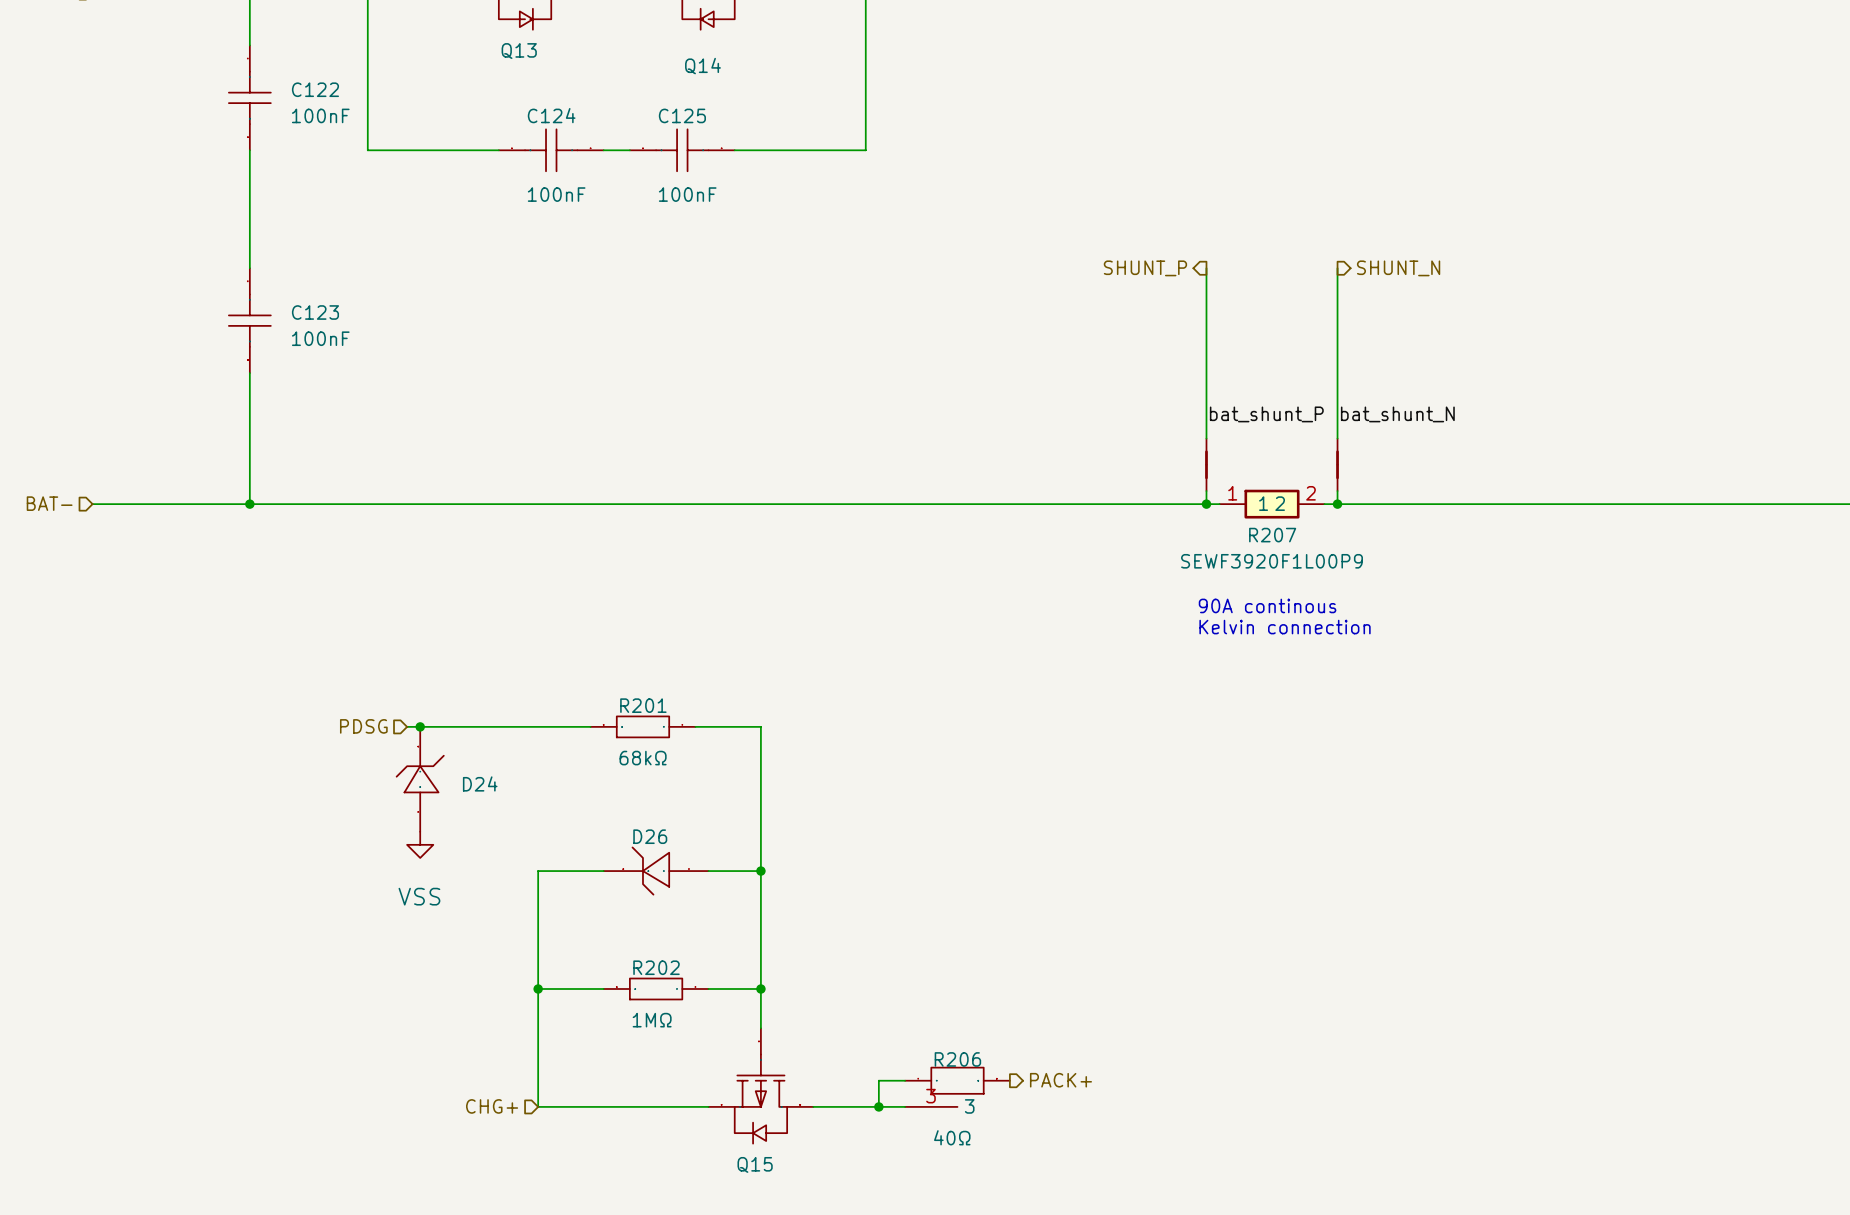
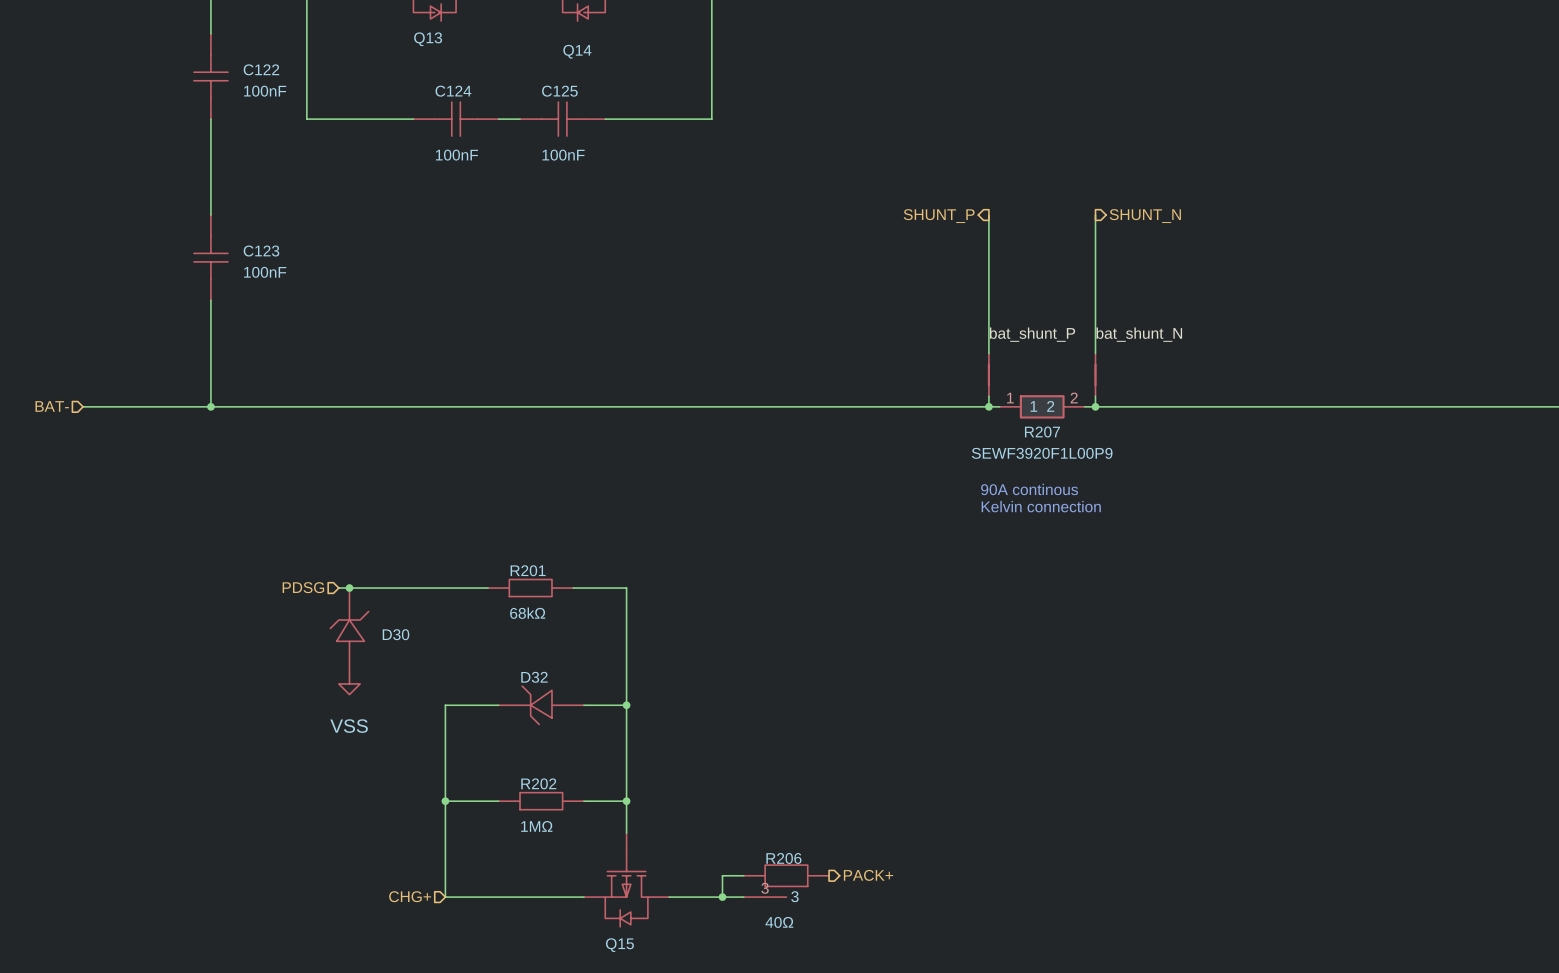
D24 name: D24 (480, 783) -> D30 (396, 634)
D26 name: D26 (650, 836) -> D32 (534, 677)

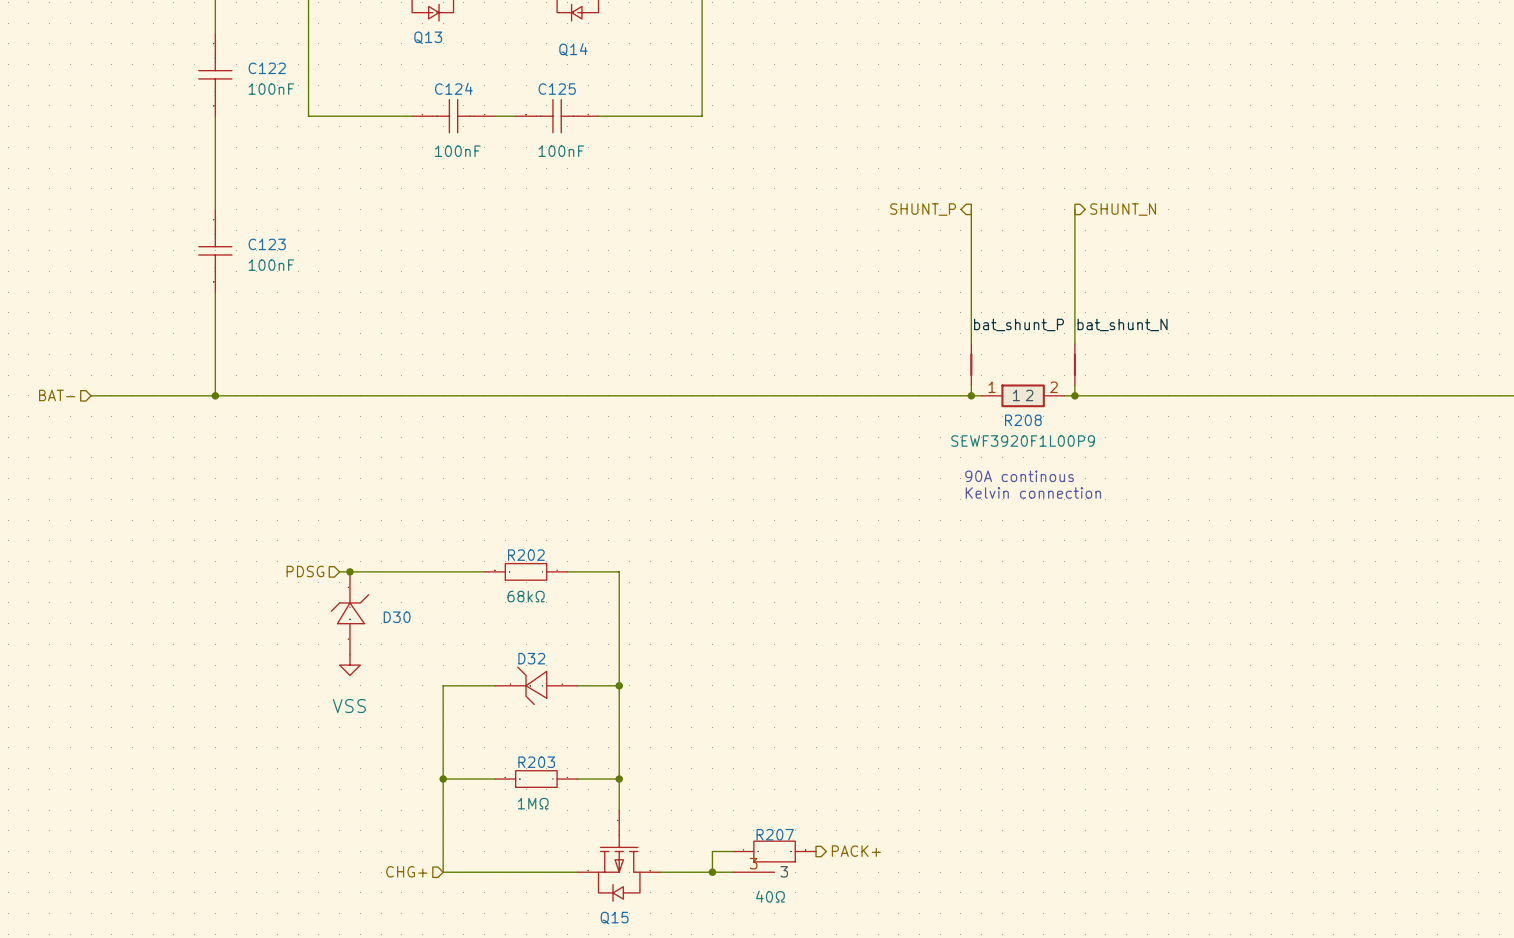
R207 name: R207 (1042, 432) -> R208 (1023, 420)
R201 name: R201 (528, 570) -> R202 (526, 555)
R202 name: R202 (538, 783) -> R203 (536, 762)
R206 name: R206 (783, 858) -> R207 (775, 834)

